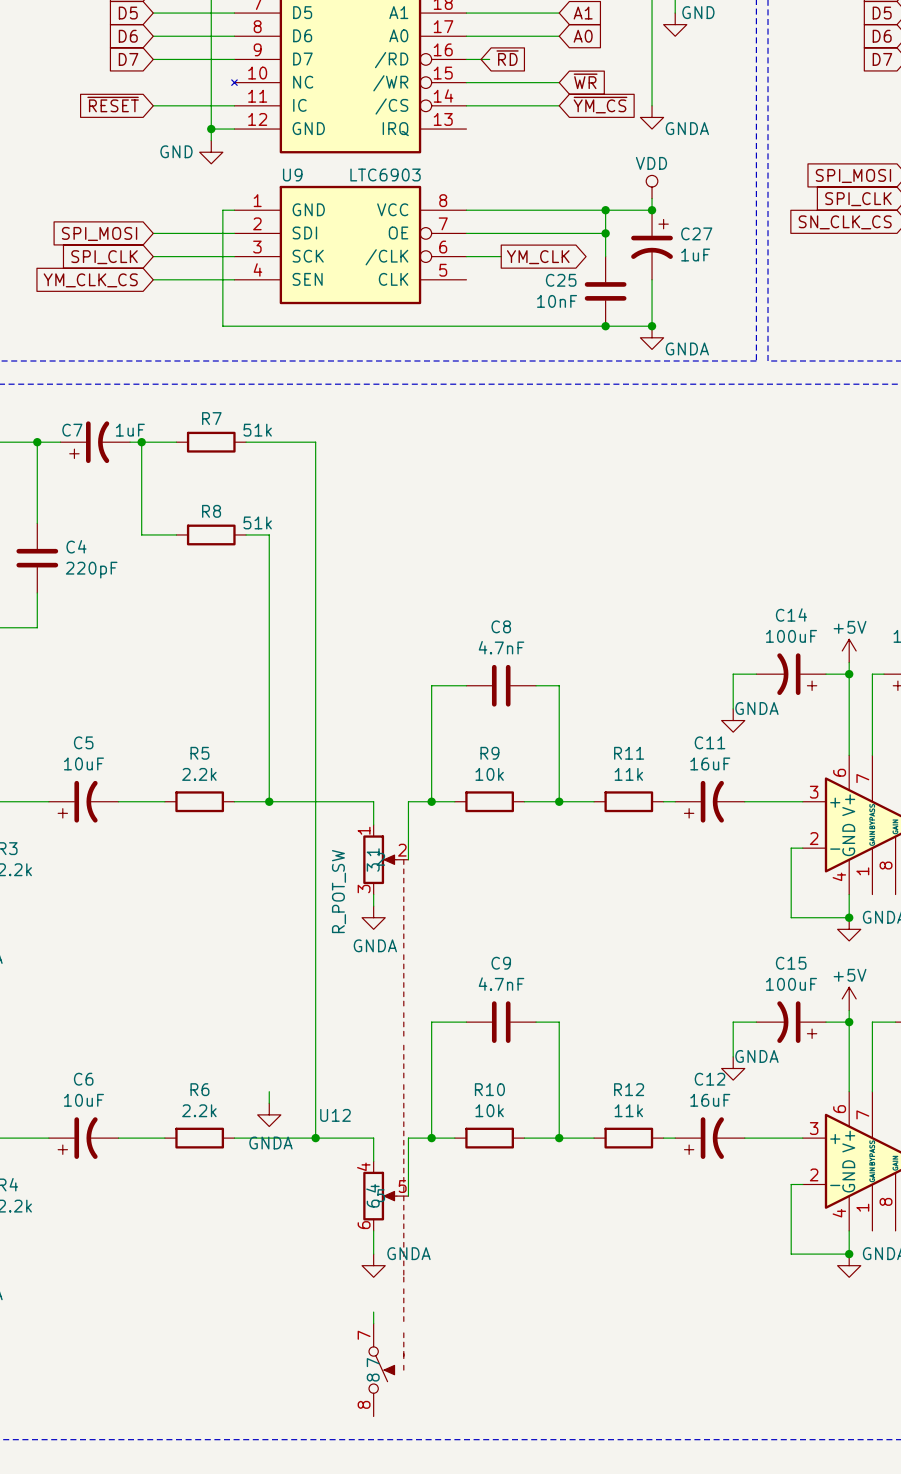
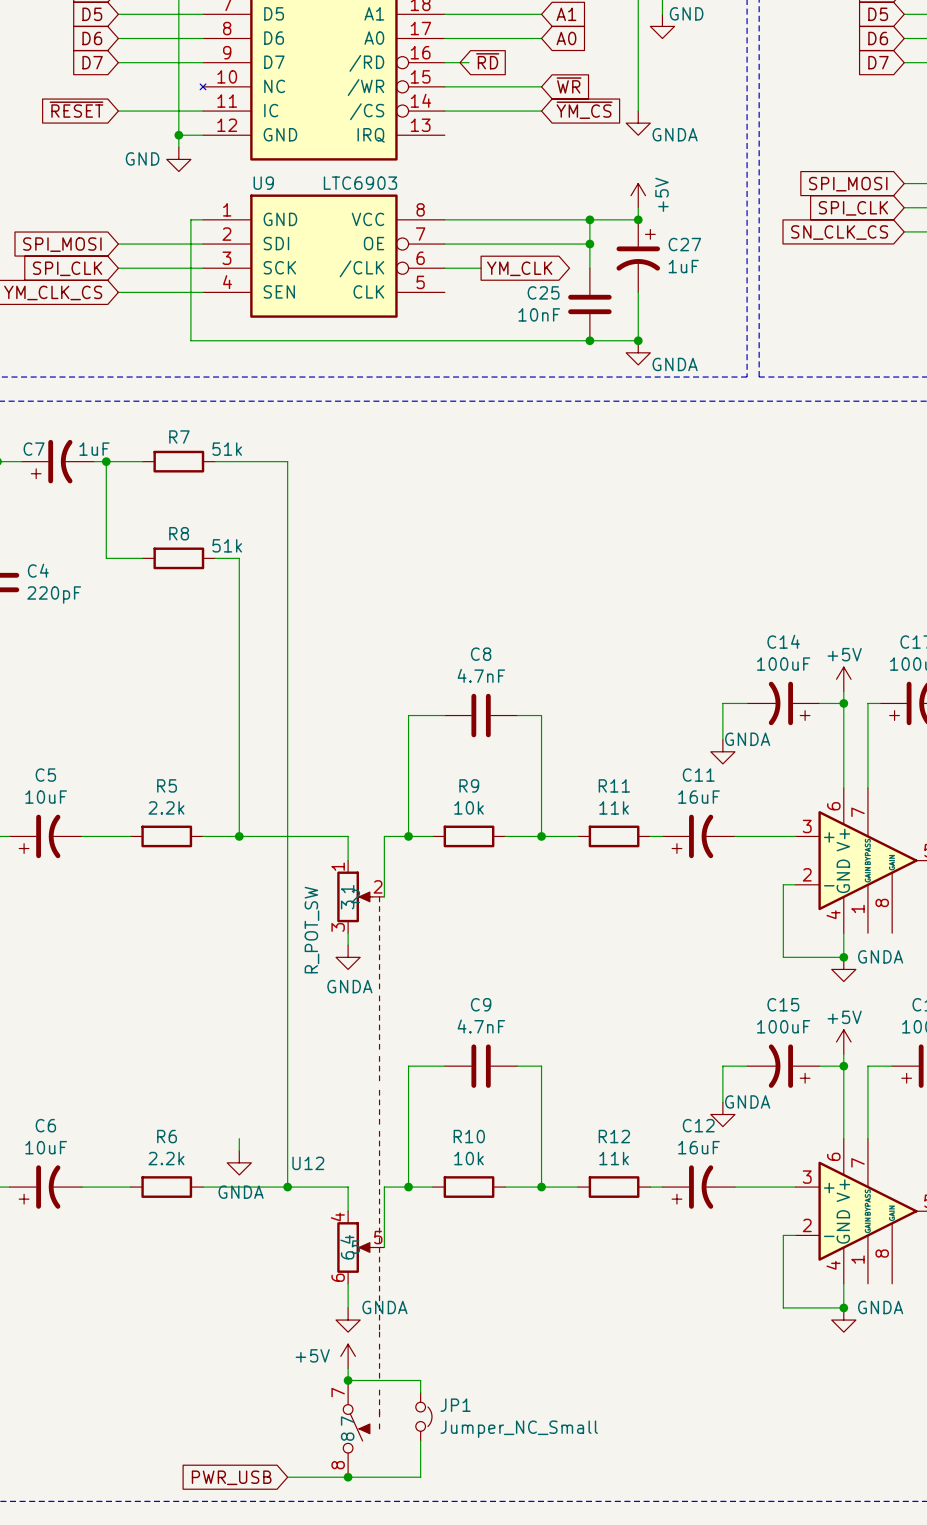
power symbol: VDD (652, 187) -> +5V (638, 195)
power symbol: none -> +5V (348, 1356)
wire: none -> (348, 1380) (420, 1380) (420, 1392)
junction: none -> (348, 1380)
JP1: none -> Jumper_NC_Small (423, 1416)
wire: none -> (420, 1440) (420, 1477) (287, 1477)
junction: none -> (348, 1477)
global label: none -> PWR_USB (231, 1477)

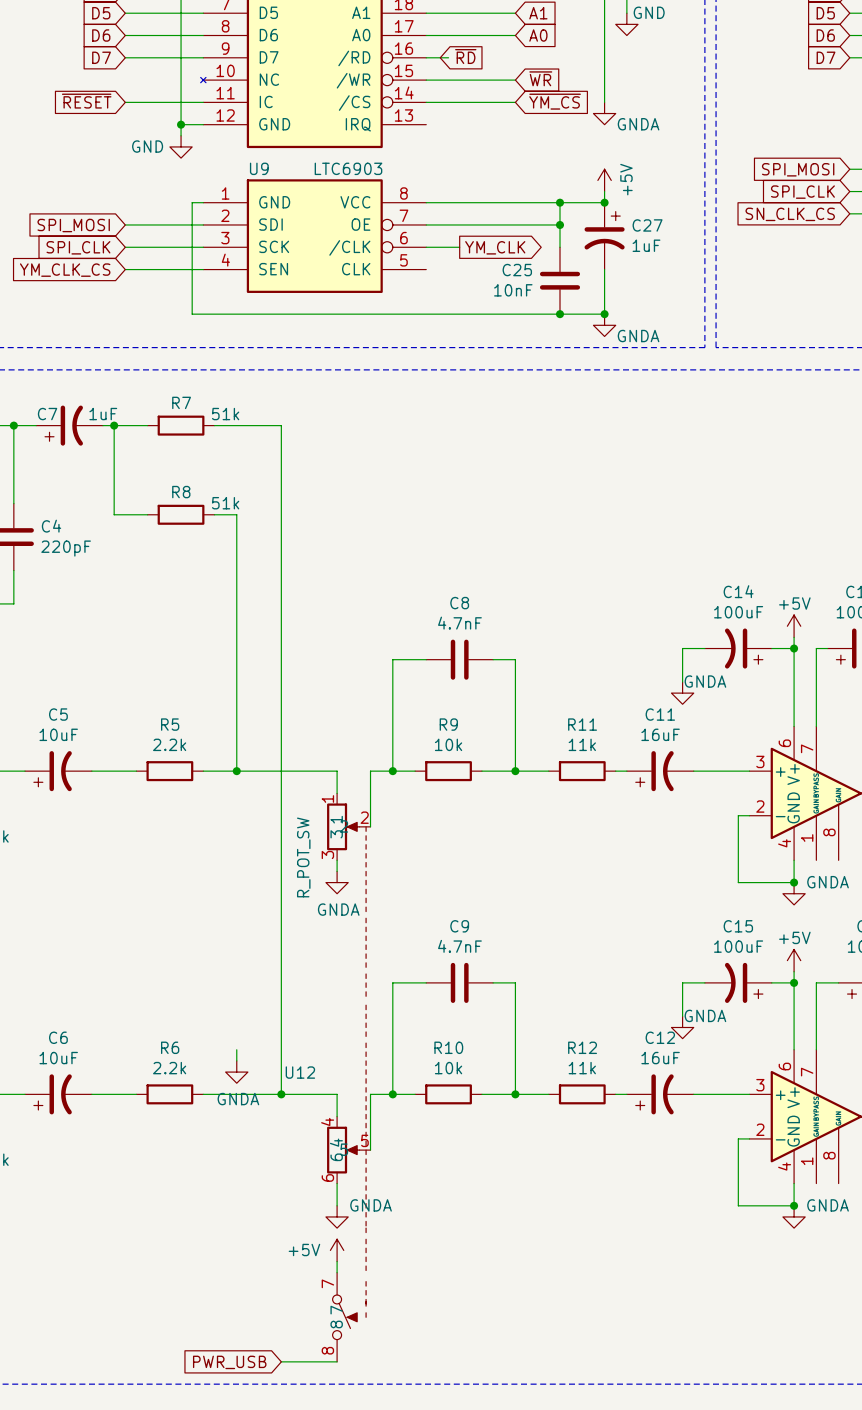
wire: (348, 1380) (420, 1380) (420, 1392) -> none
junction: (348, 1380) -> none
JP1: Jumper_NC_Small (423, 1416) -> none
wire: (420, 1440) (420, 1477) (348, 1477) -> none
junction: (348, 1477) -> none

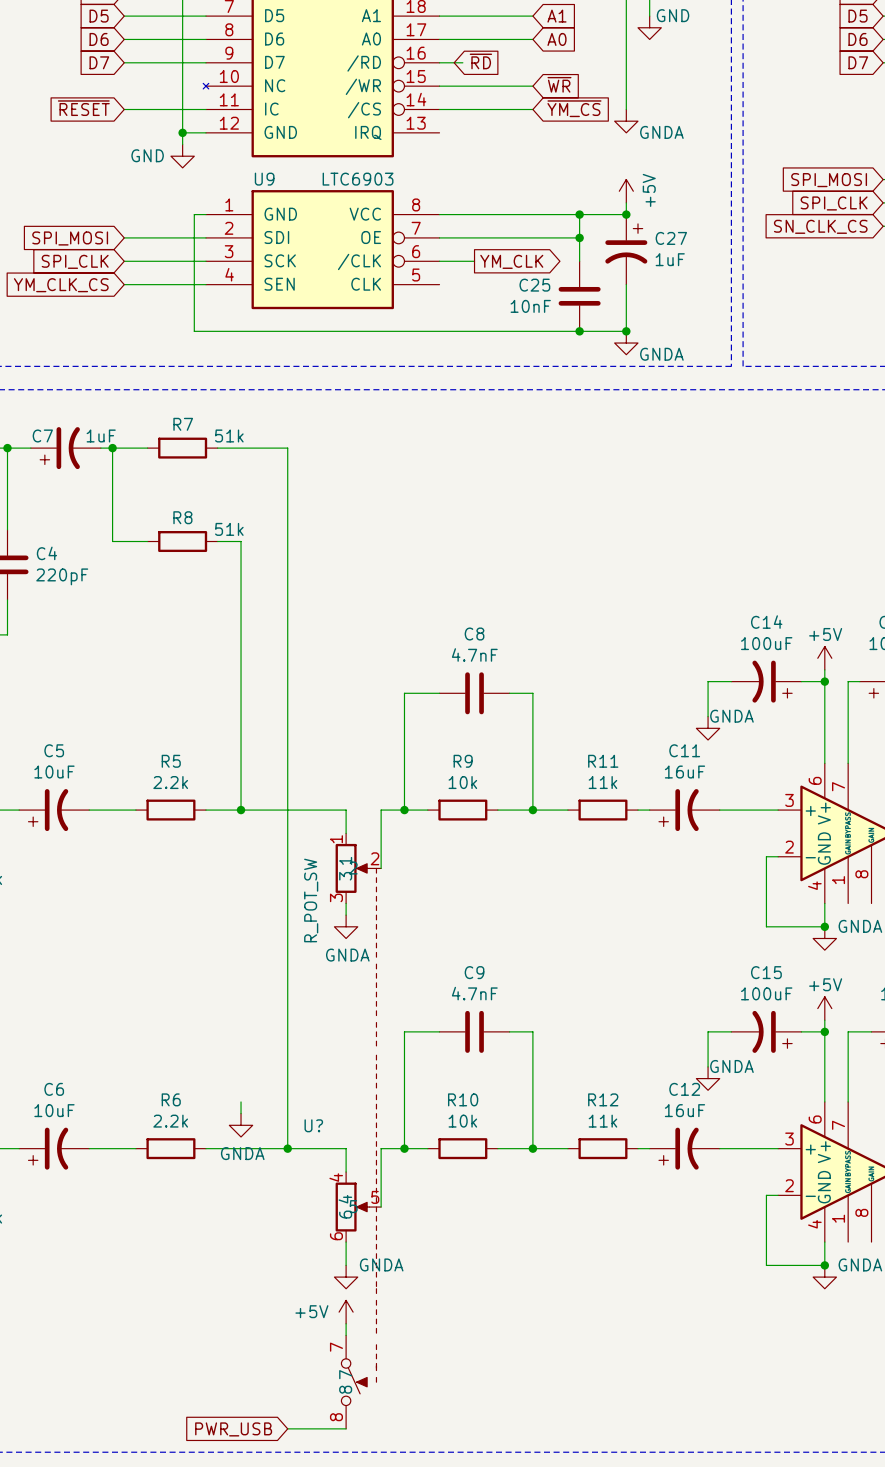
U12 name: U12 (300, 1072) -> U? (313, 1125)

